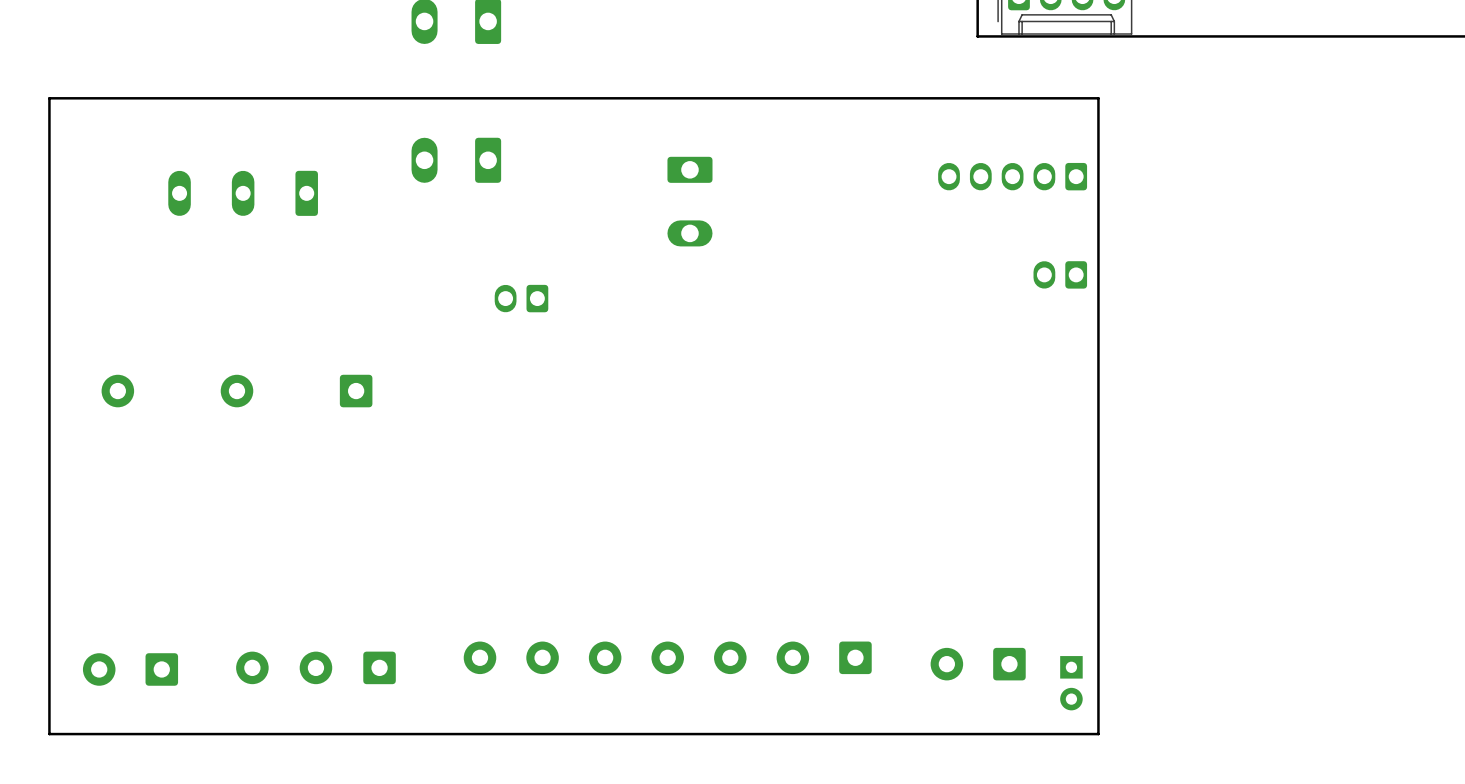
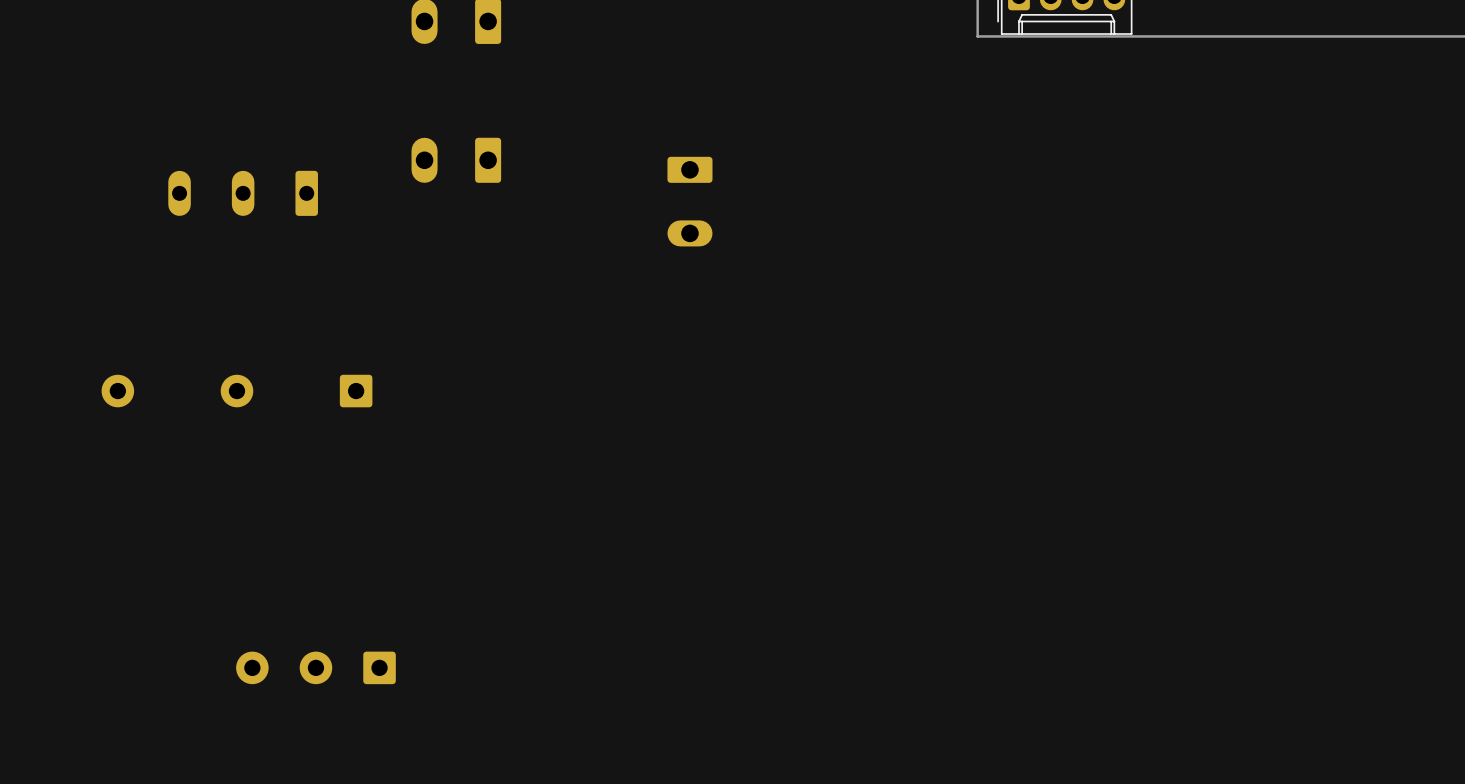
board edge: (1098, 98) (49, 98) (49, 734) (1098, 734) (1098, 98) -> none
part: (1012, 176) -> none
part: (1060, 274) -> none
part: (521, 298) -> none
part: (667, 657) -> none
part: (978, 664) -> none
part: (130, 669) -> none
part: (1071, 683) -> none

